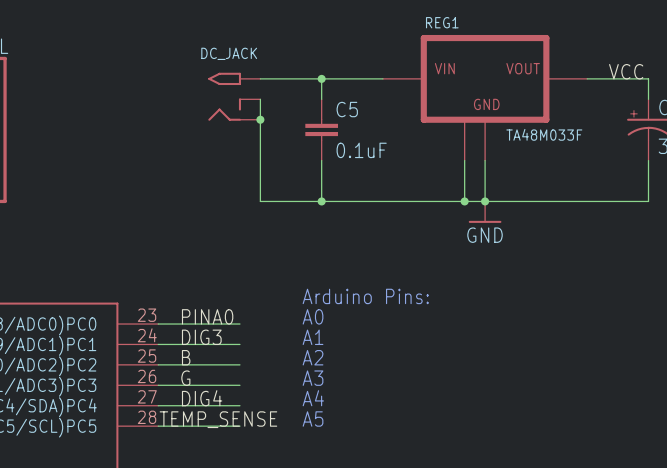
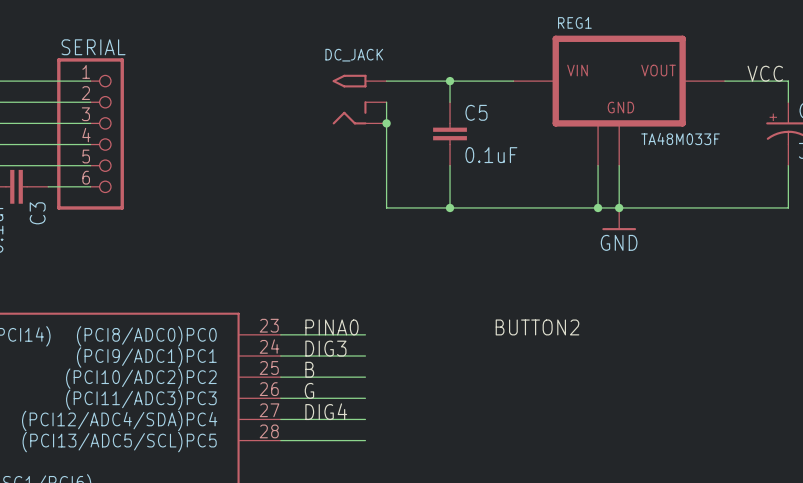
text: Arduino Pins: (365, 296) -> none
text: A0 (313, 316) -> none
label: none -> BUTTON2 (537, 327)
text: A1 (313, 337) -> none
text: A2 (313, 357) -> none
text: A3 (313, 378) -> none
text: A4 (313, 398) -> none
label: TEMP_SENSE (218, 419) -> none
text: A5 (313, 419) -> none

